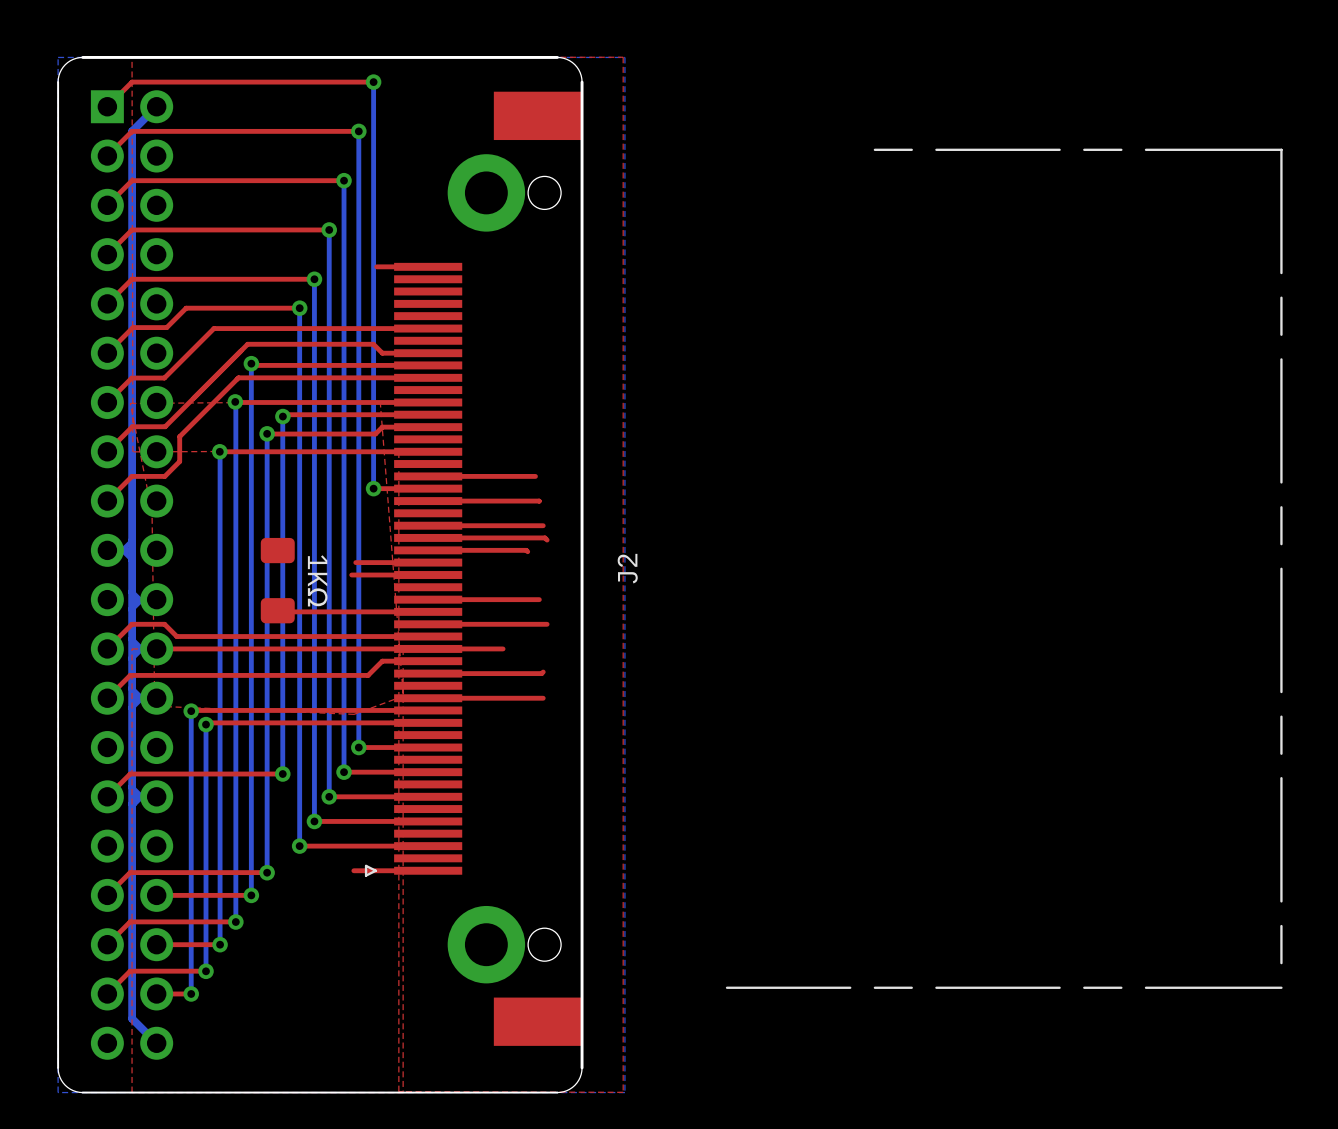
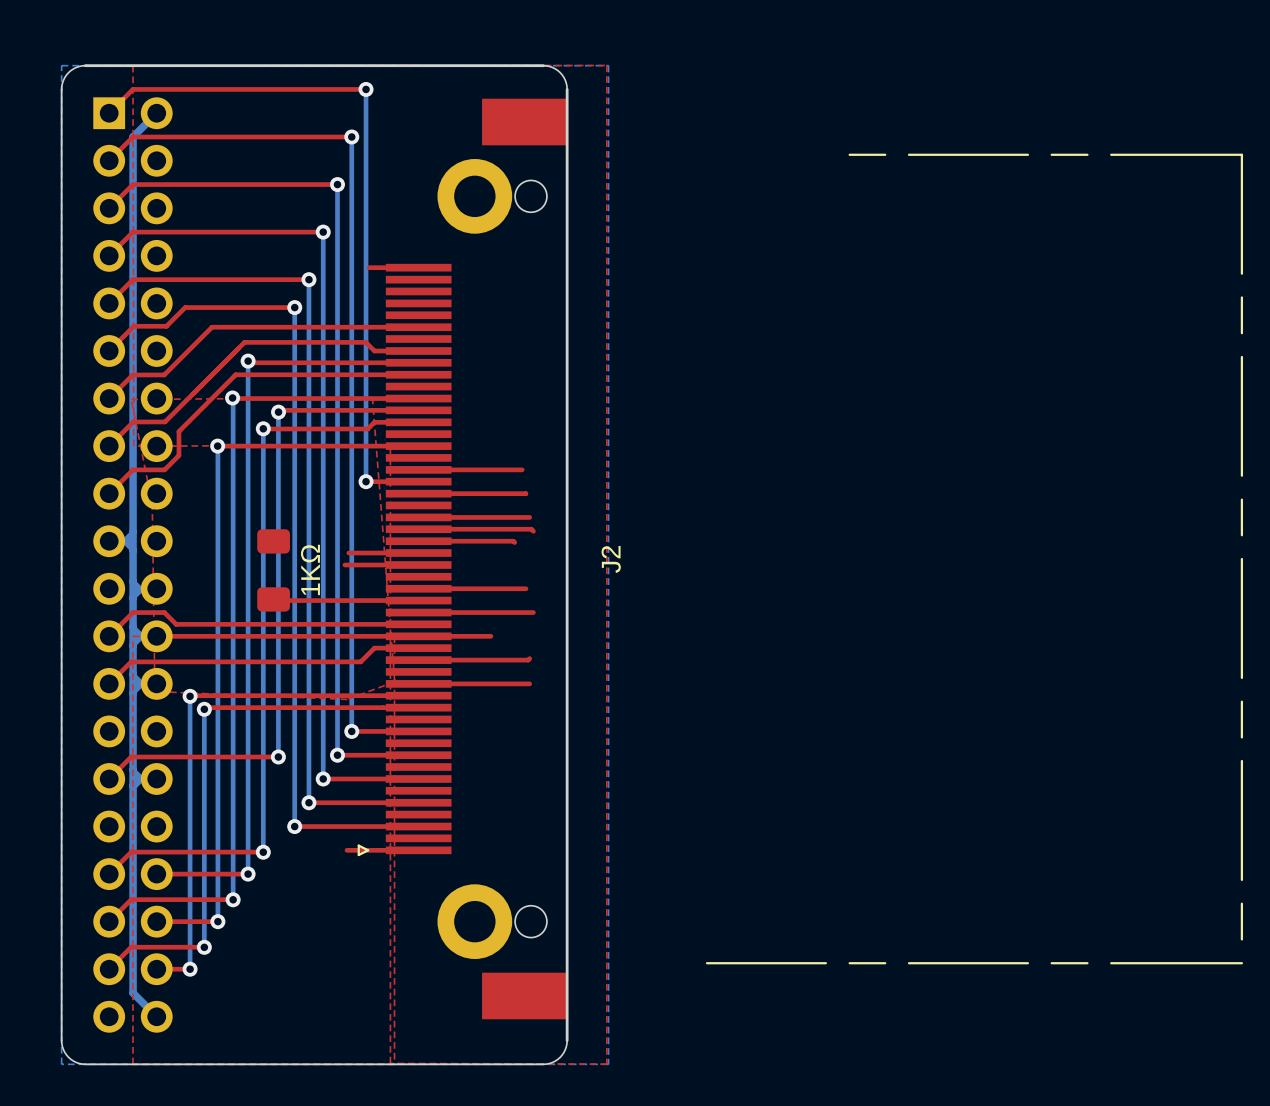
part value rotation: 0° (317, 580) -> 180° (310, 569)

